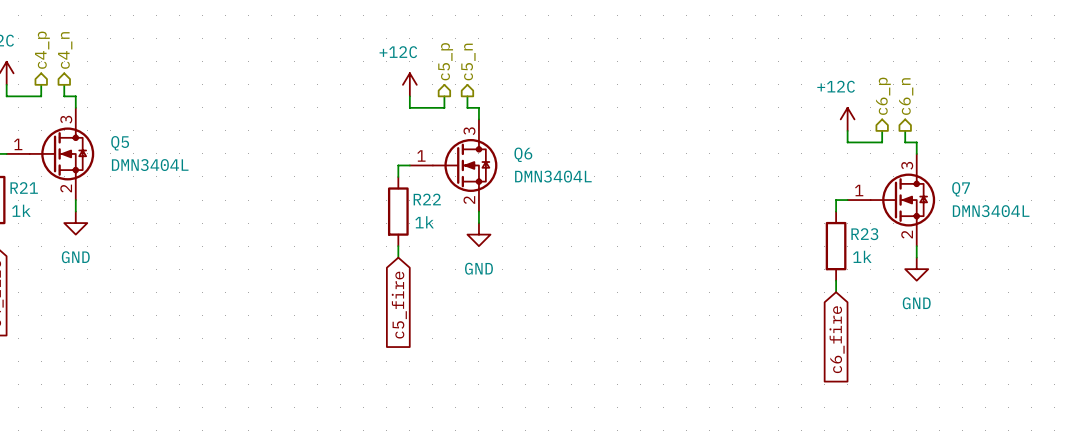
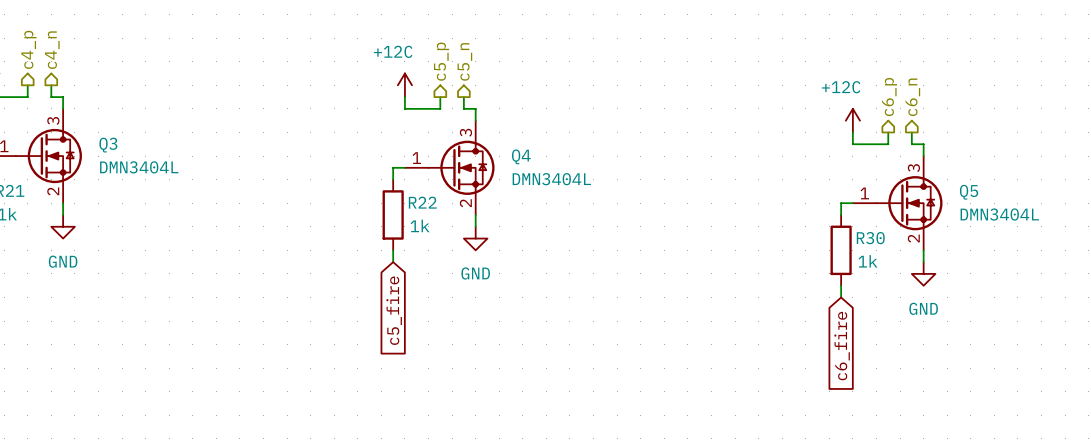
Q5 name: Q5 (120, 143) -> Q3 (108, 145)
Q6 name: Q6 (523, 154) -> Q4 (521, 156)
Q7 name: Q7 (961, 189) -> Q5 (969, 192)
R23 name: R23 (864, 234) -> R30 (870, 238)

